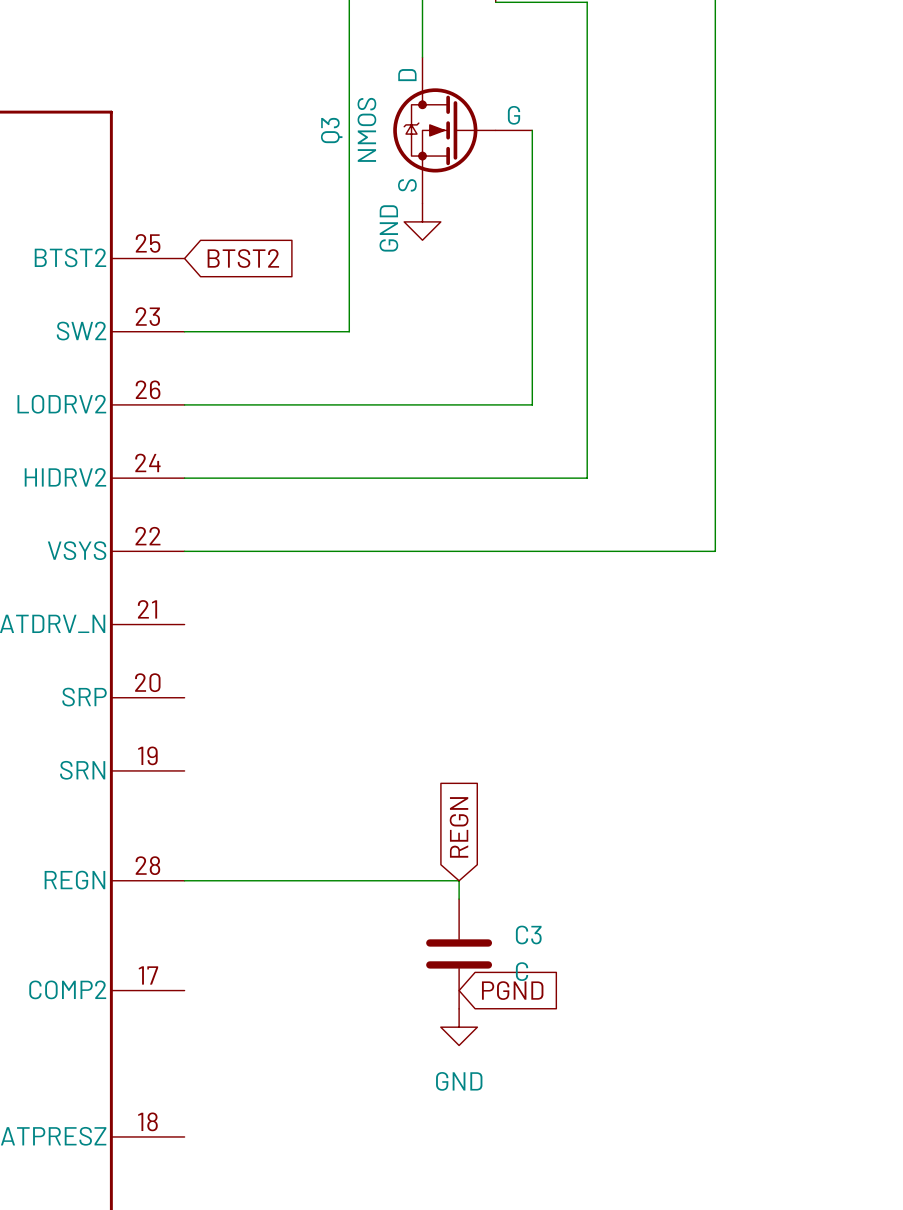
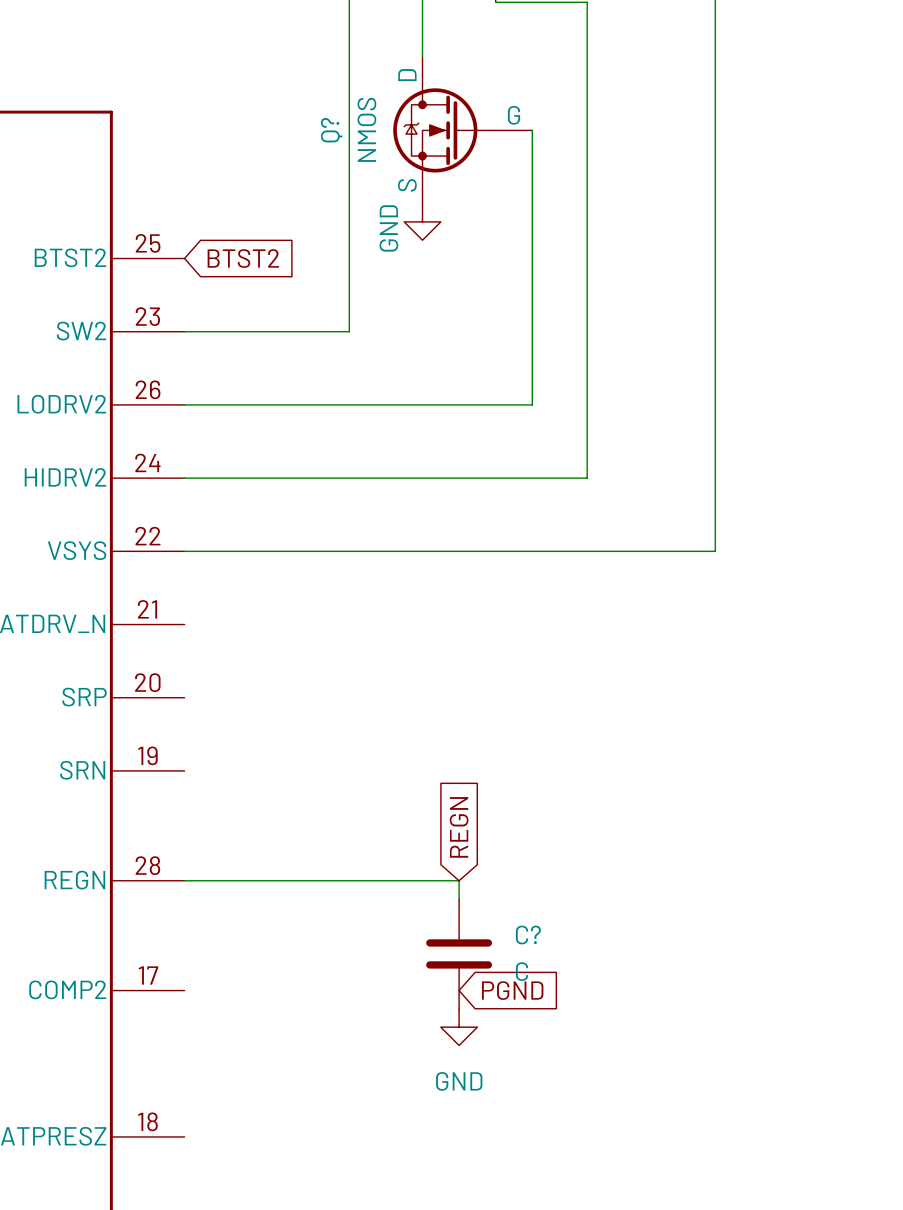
Q3 name: Q3 (331, 130) -> Q? (331, 130)
C3 name: C3 (528, 934) -> C? (528, 934)

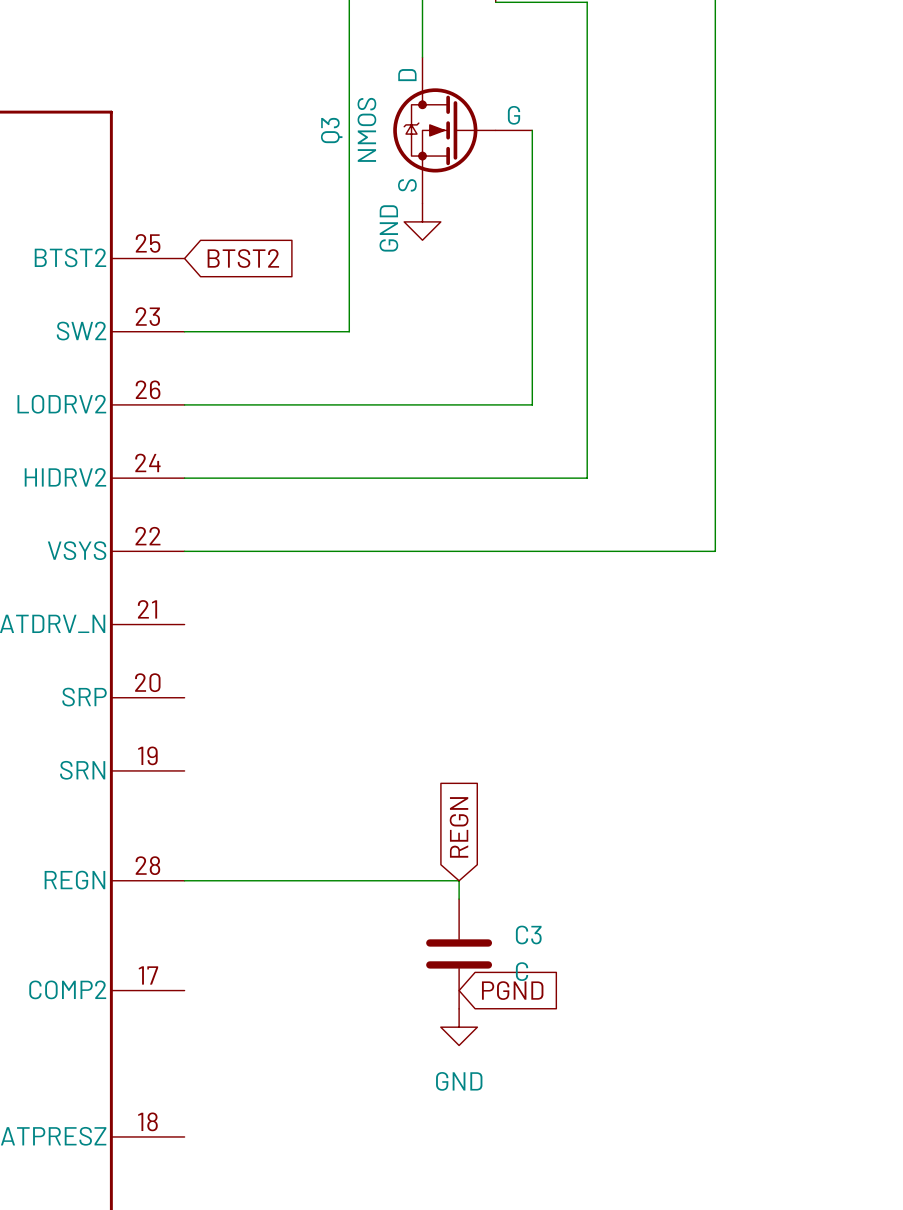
Q? name: Q? (331, 130) -> Q3 (331, 130)
C? name: C? (528, 934) -> C3 (528, 934)

